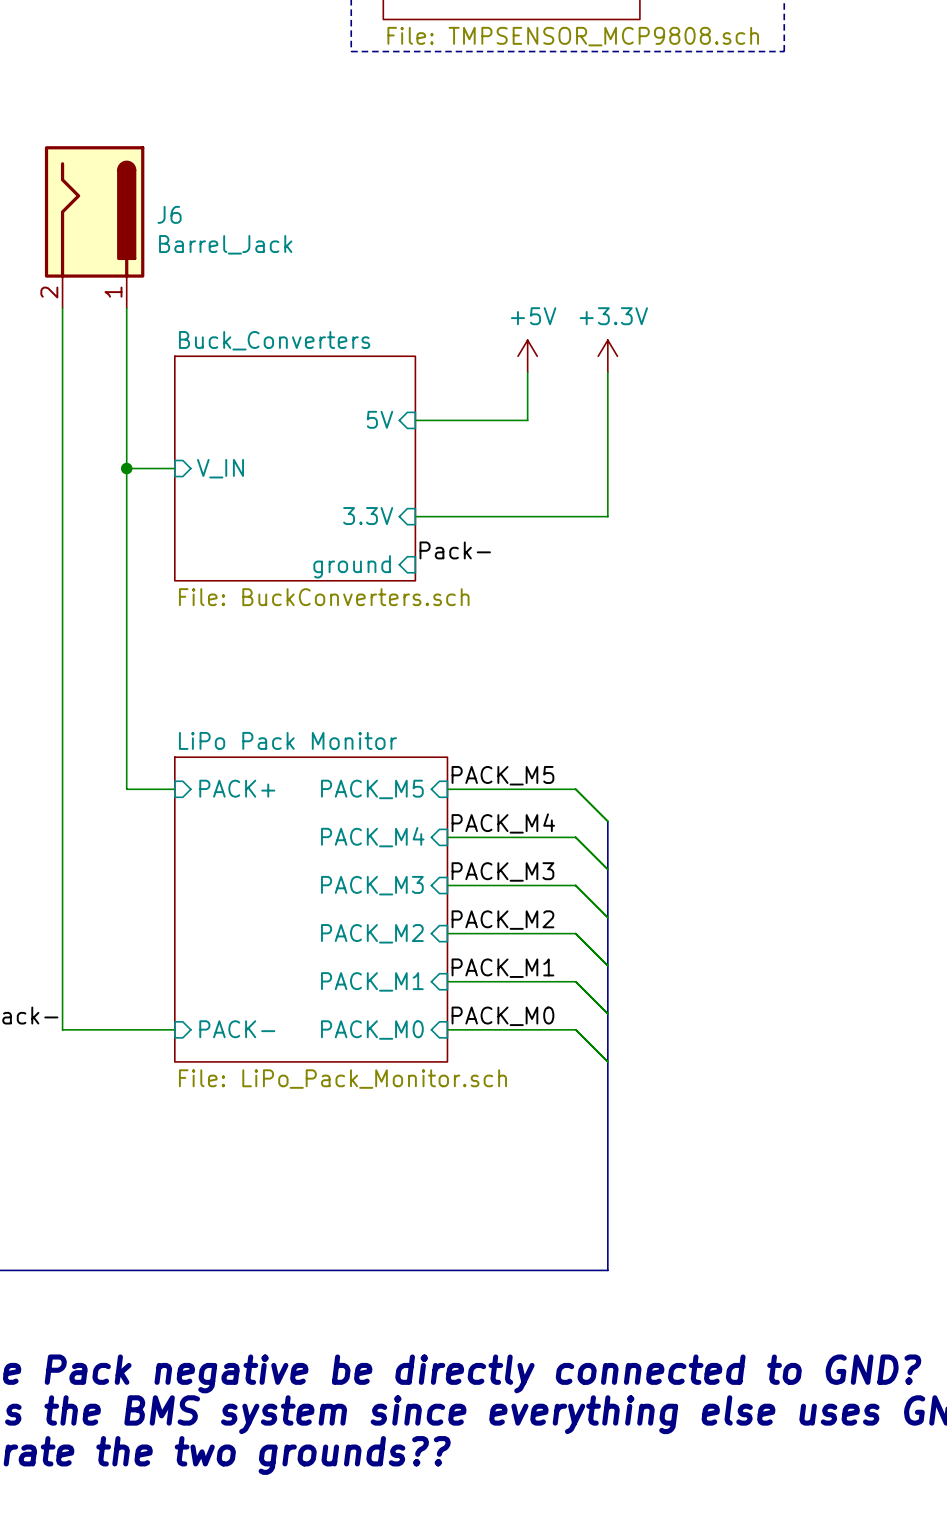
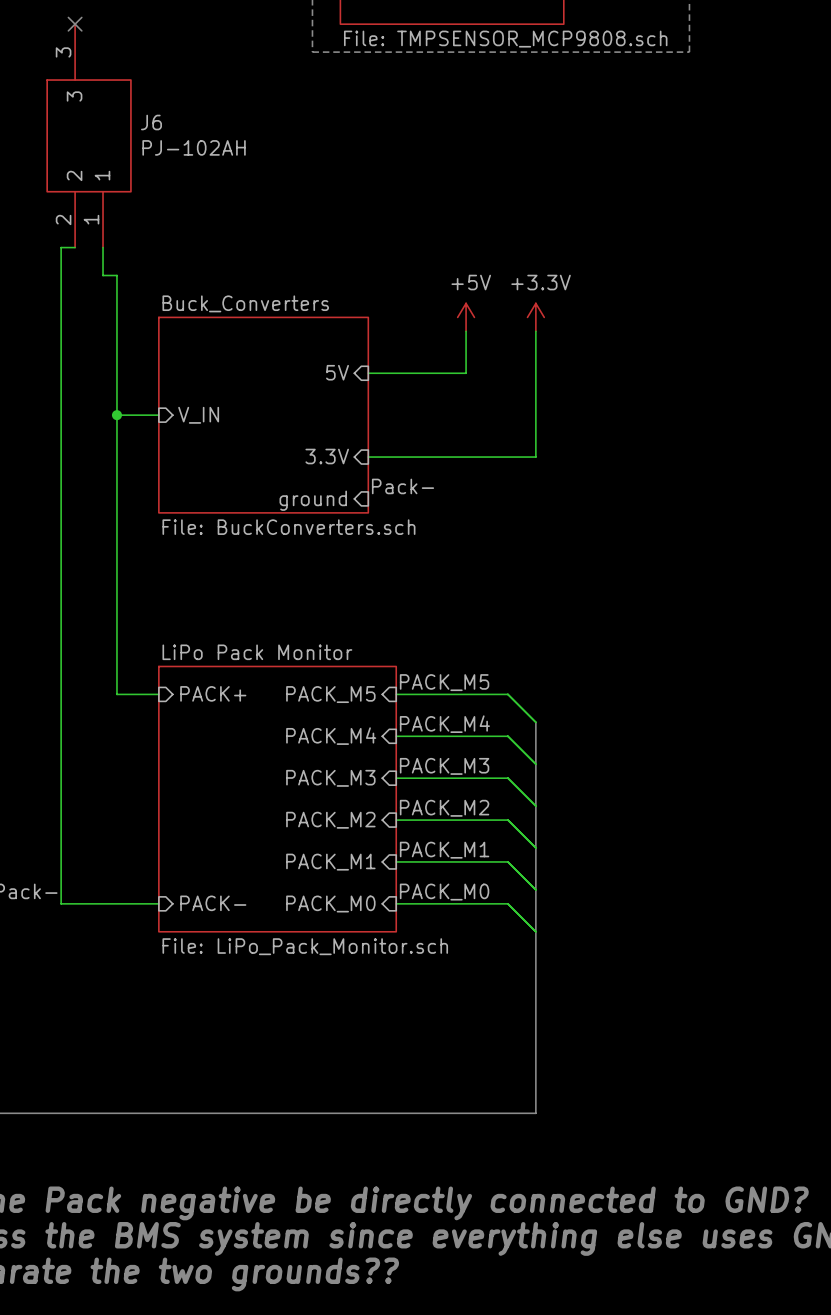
no-connect mark: none -> (75, 24)
J6 symbol: [44, 146, 145, 309] -> [46, 24, 132, 248]
J6 value: Barrel_Jack (225, 244) -> PJ-102AH (194, 147)
wire: none -> (103, 247) (103, 275) (116, 275)

